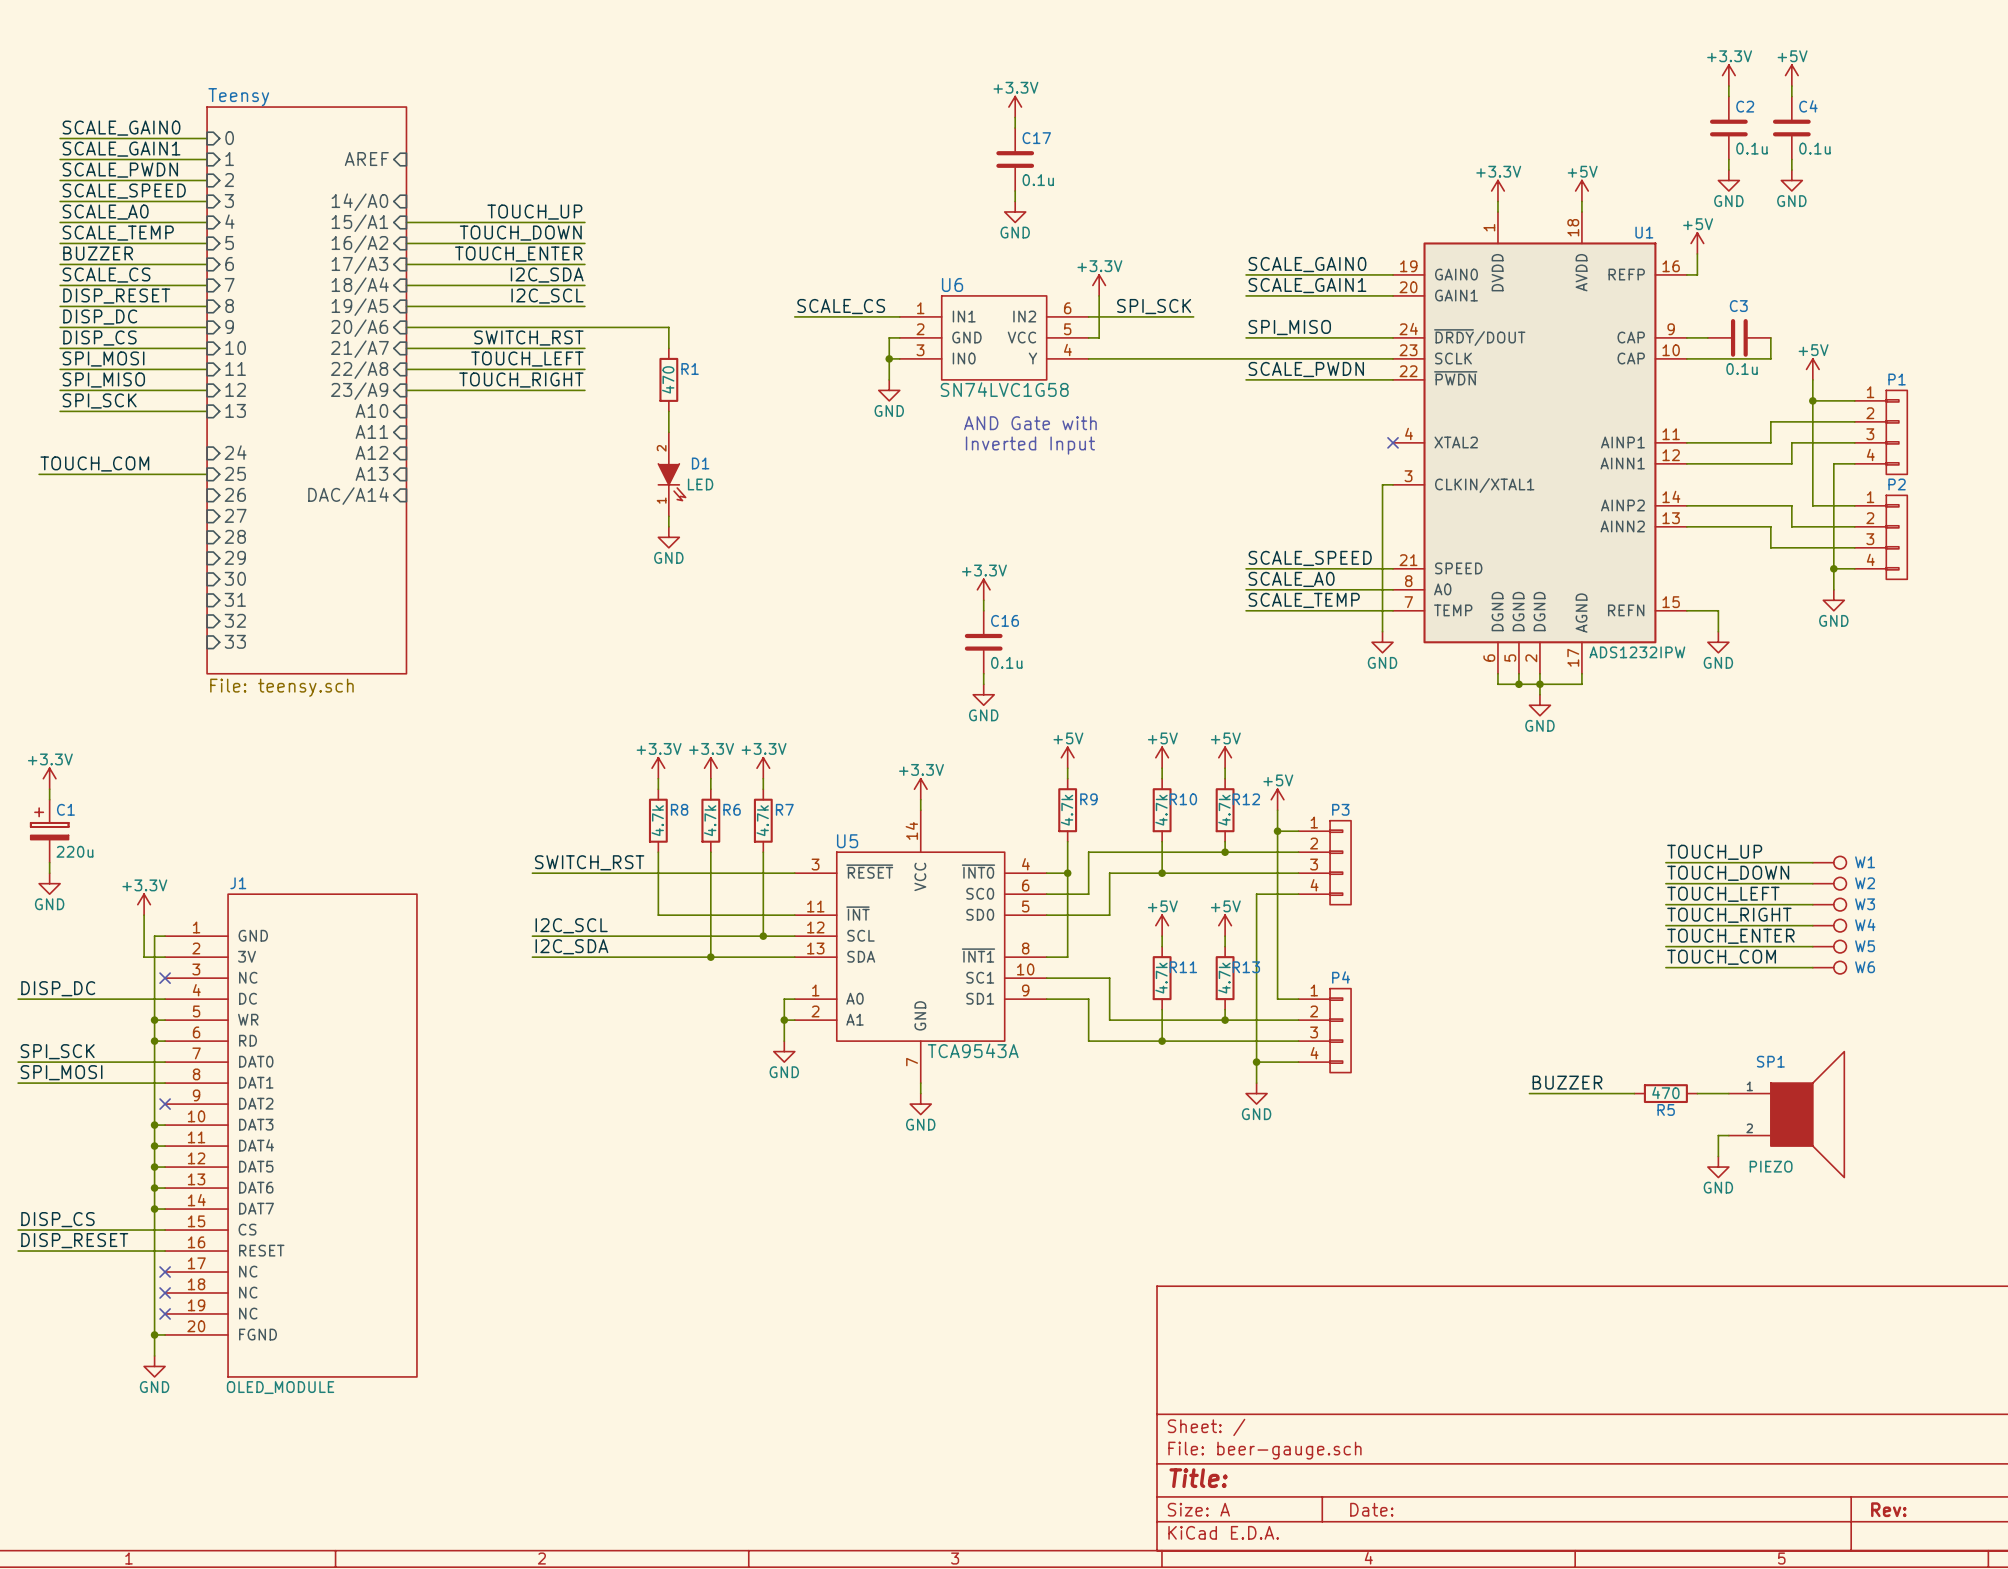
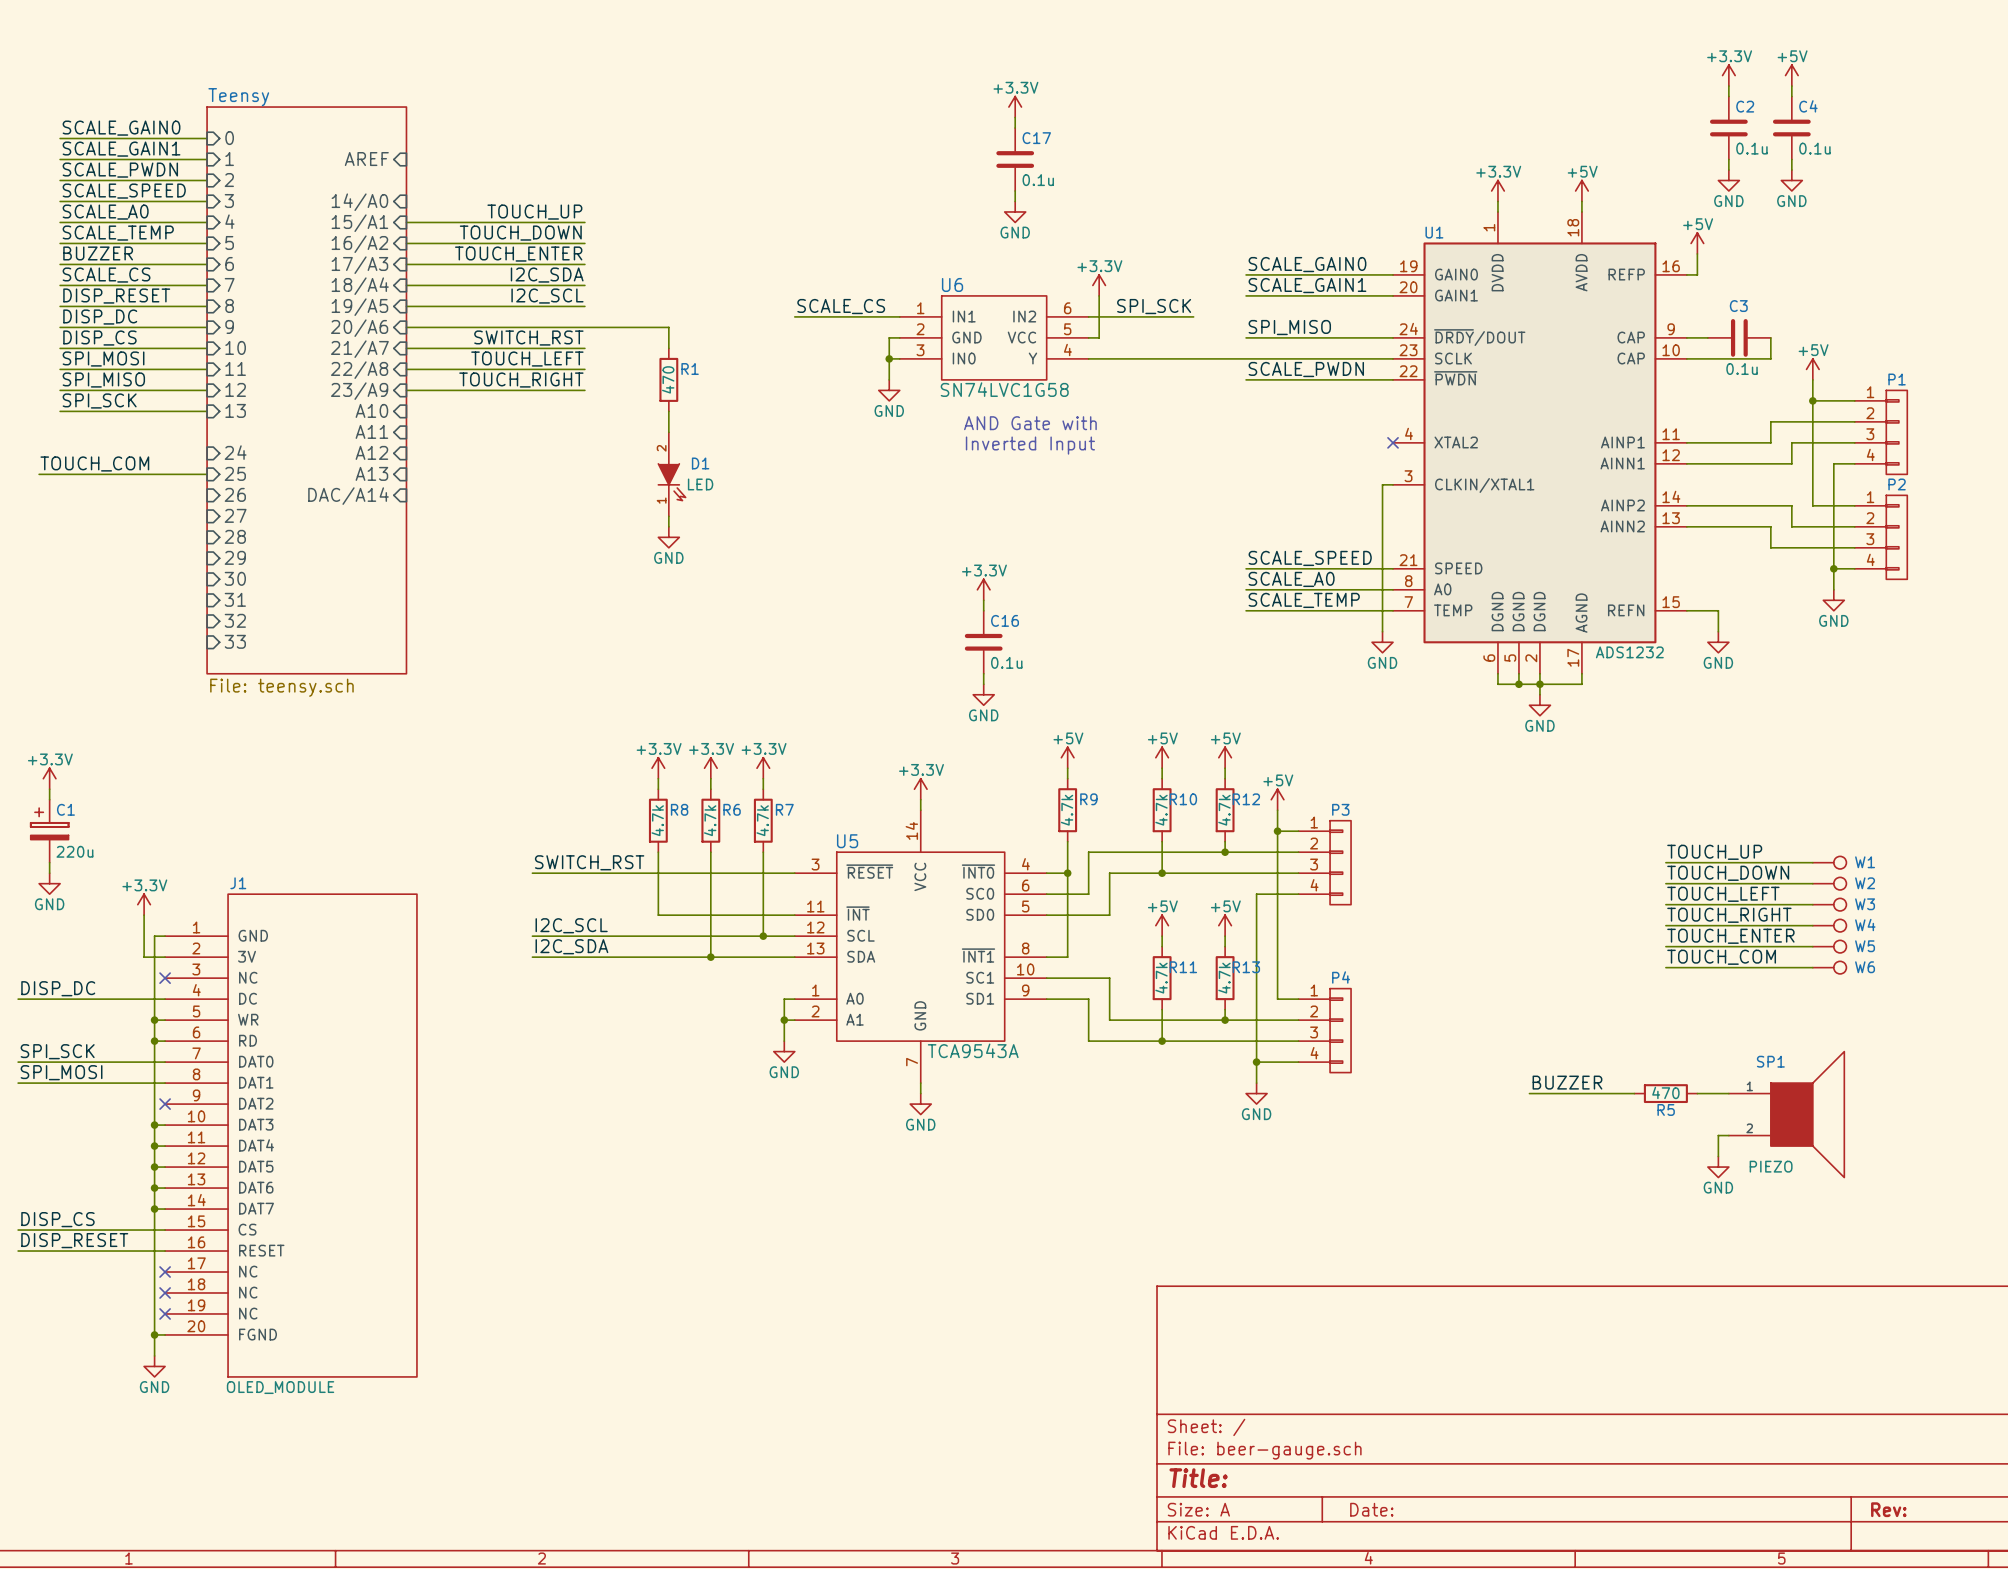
U1 name position: U1 (1644, 232) -> U1 (1434, 232)
U1 value: ADS1232IPW (1637, 652) -> ADS1232 (1629, 652)

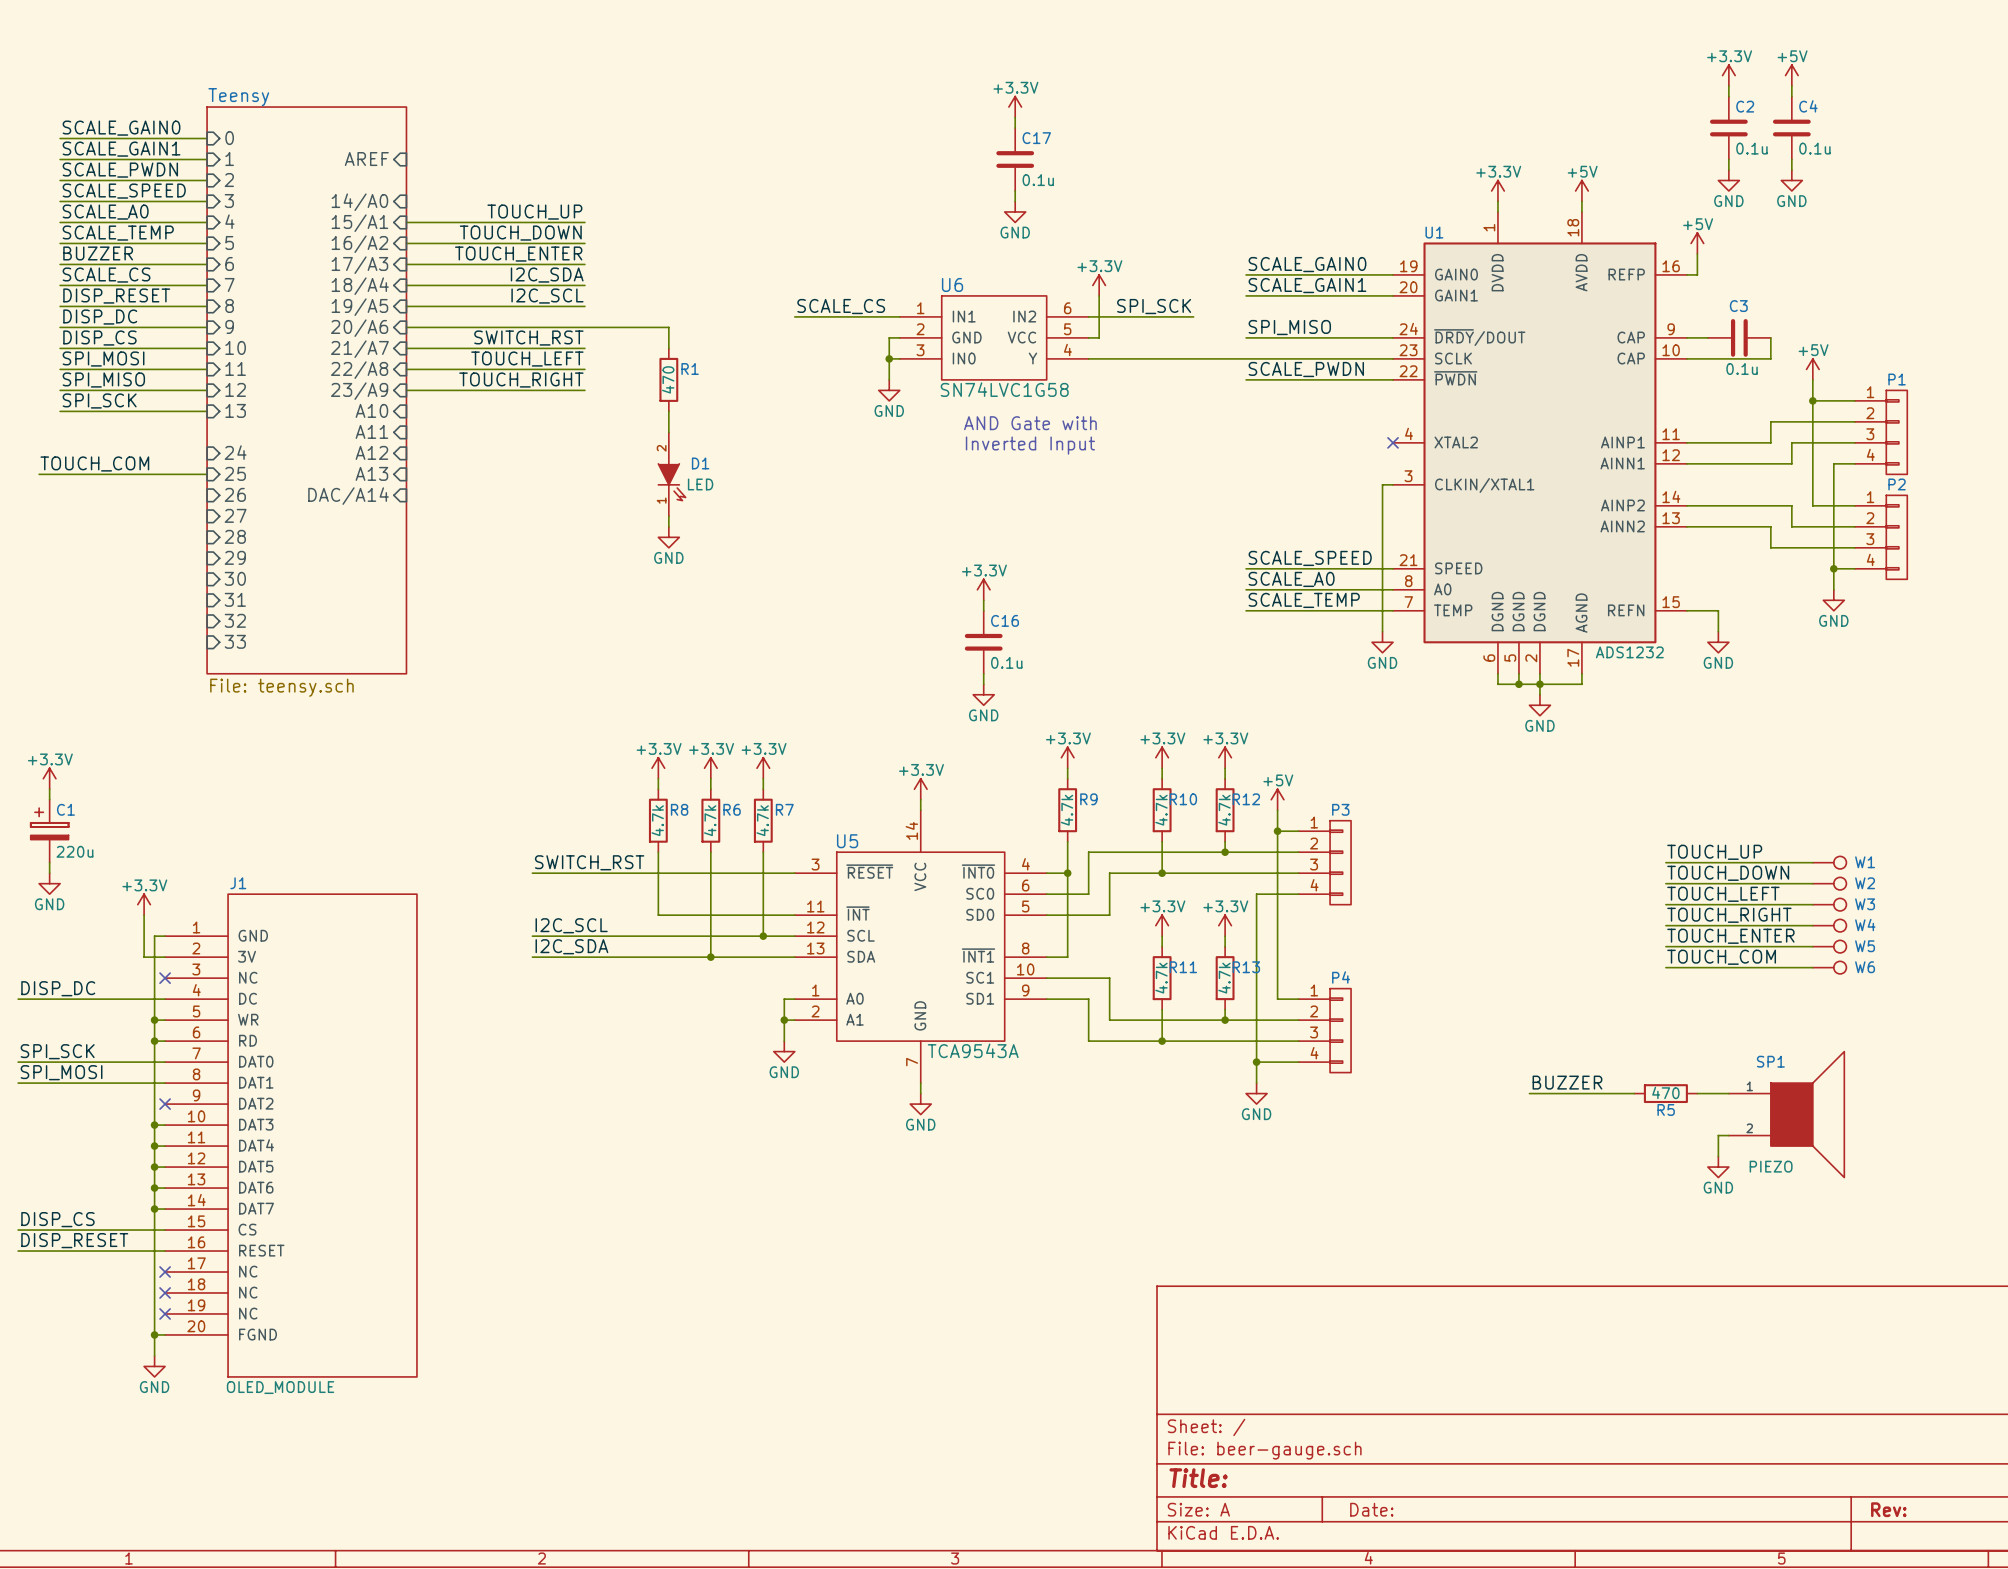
power symbol: +5V (1067, 757) -> +3.3V (1067, 757)
power symbol: +5V (1162, 757) -> +3.3V (1162, 757)
power symbol: +5V (1225, 757) -> +3.3V (1225, 757)
power symbol: +5V (1162, 925) -> +3.3V (1162, 925)
power symbol: +5V (1225, 925) -> +3.3V (1225, 925)

